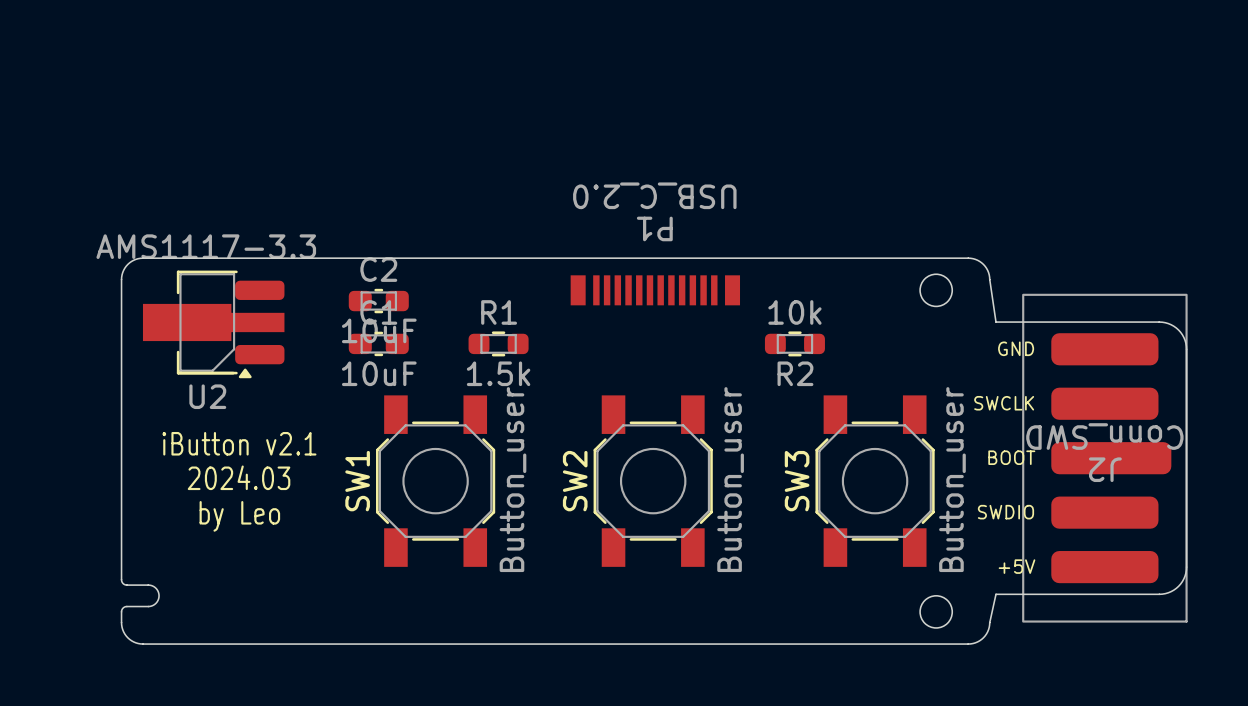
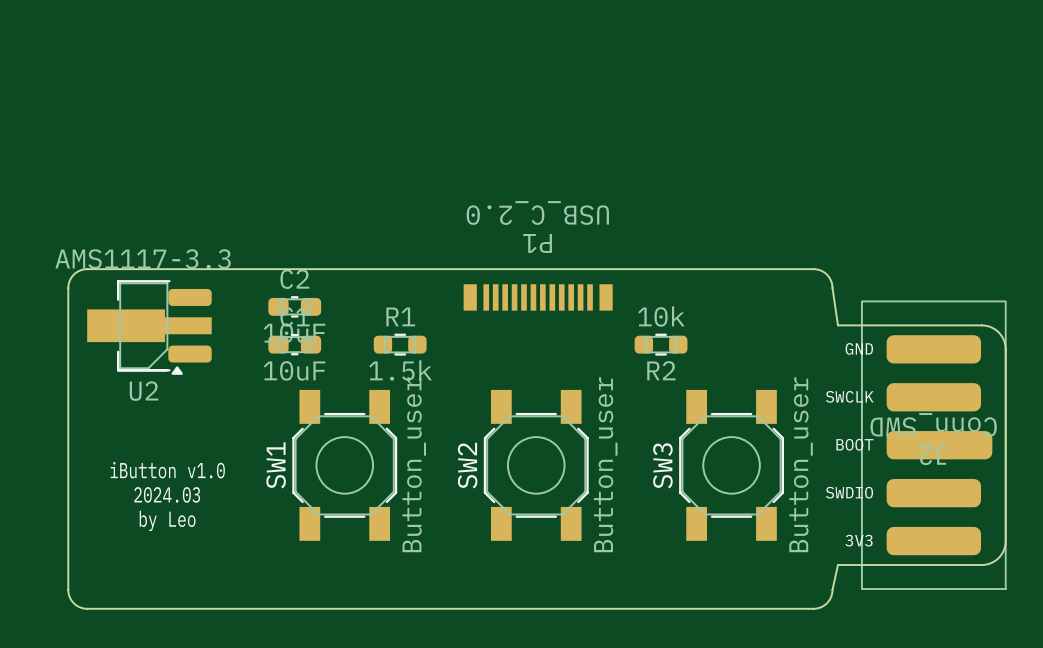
round board edge: [919, 273, 953, 307] -> none
text: iButton v2.1 (239, 443) -> none
text: 2024.03 (239, 477) -> iButton v1.0 (167, 470)
text: by Leo (239, 516) -> 2024.03 (167, 494)
text: none -> by Leo (167, 520)
text: +5V (1017, 566) -> 3V3 (859, 540)
board edge: (121, 579) (125, 584) (152, 585) (156, 589) (159, 595) (156, 602) (152, 605) (125, 606) (121, 611) -> (68, 552) (68, 580)
round board edge: [919, 595, 953, 629] -> none

